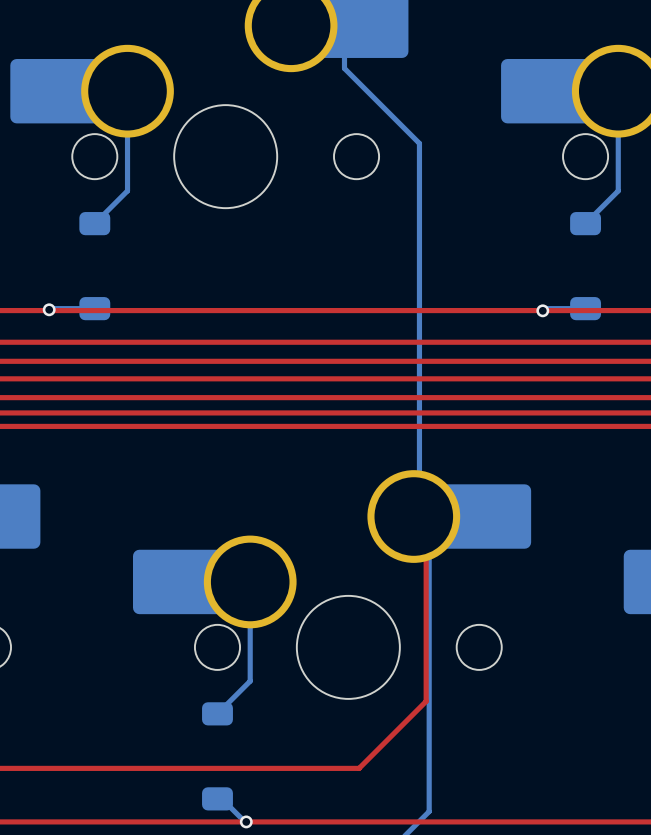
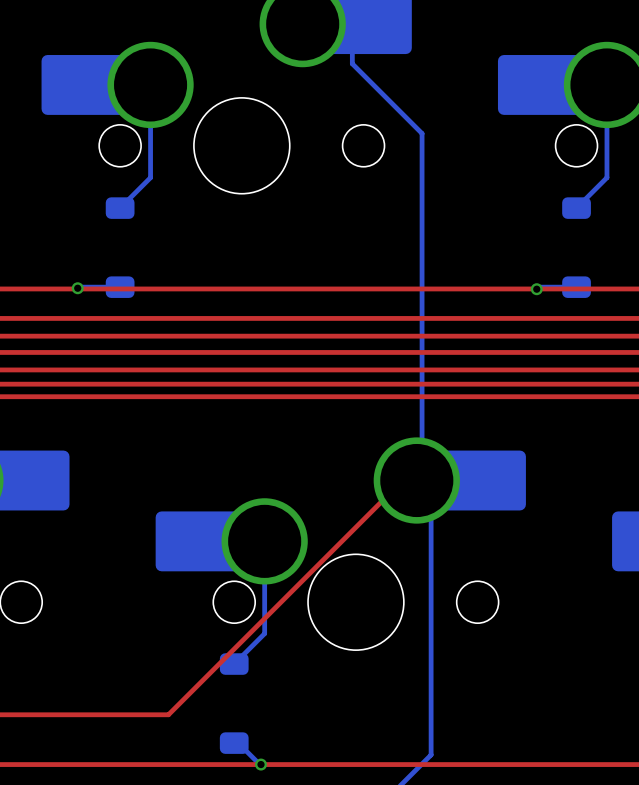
top track: (426, 528) (426, 701) (359, 768) (146, 768) -> (402, 480) (168, 714)

